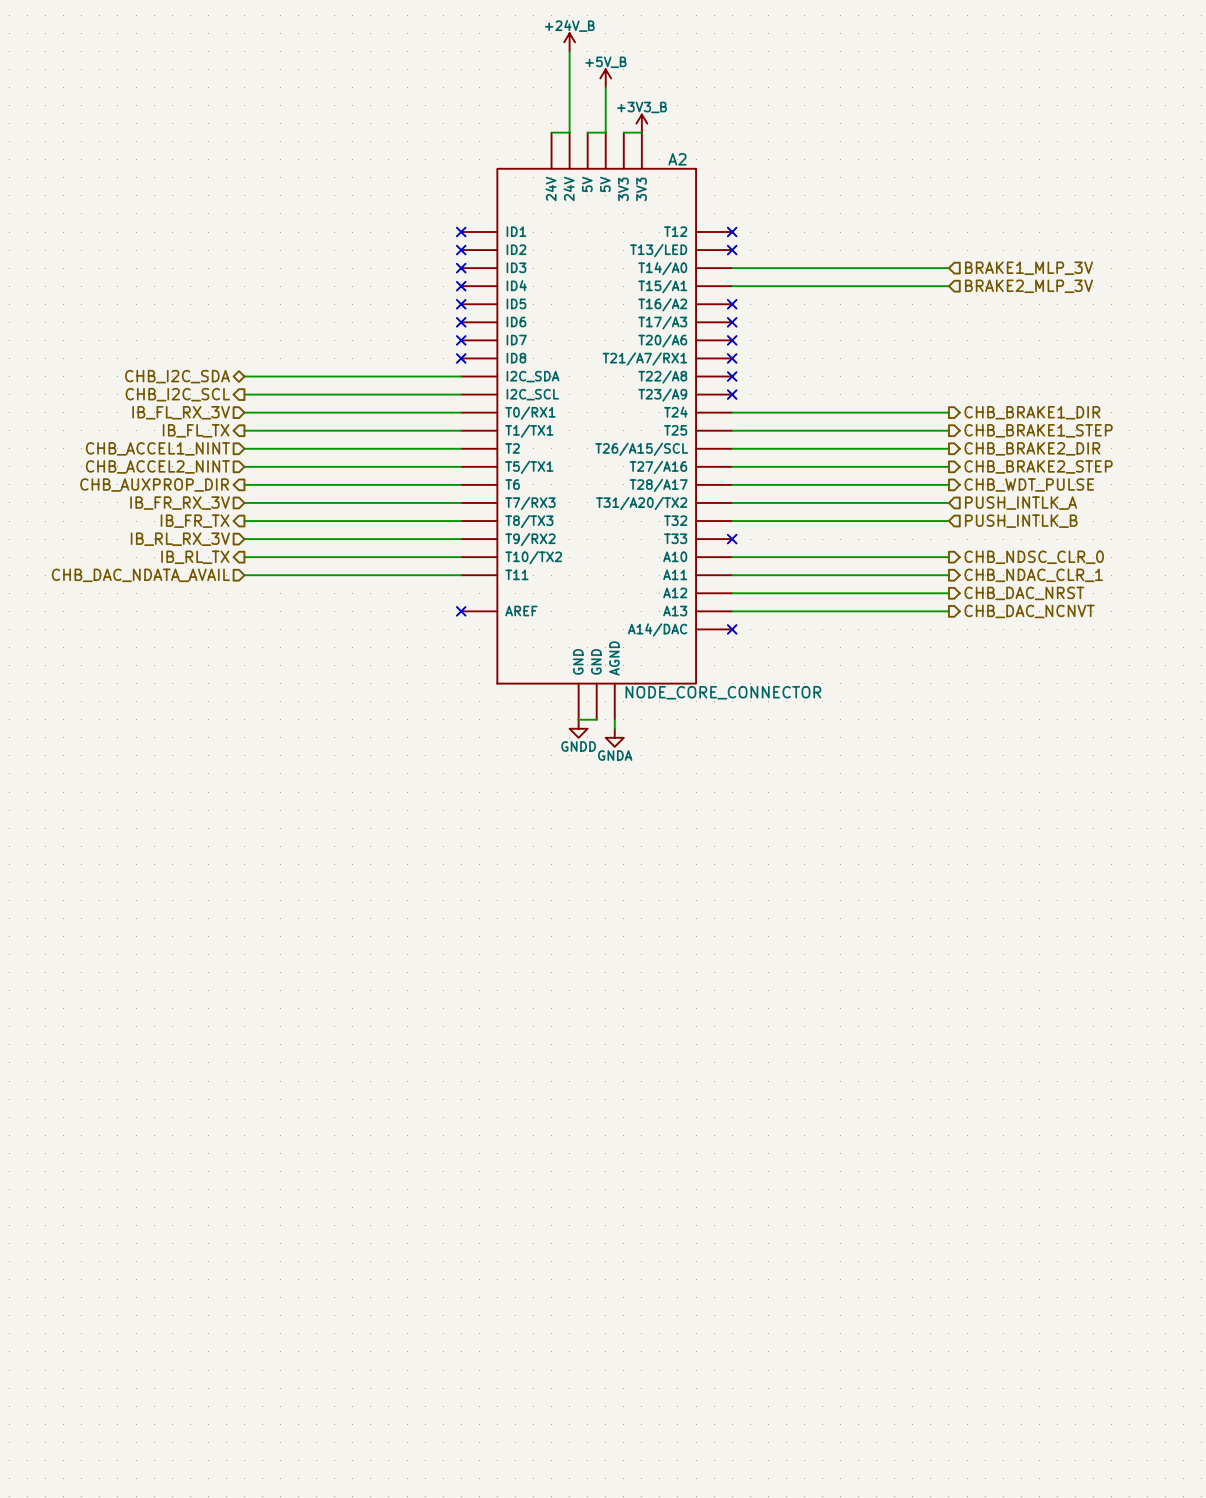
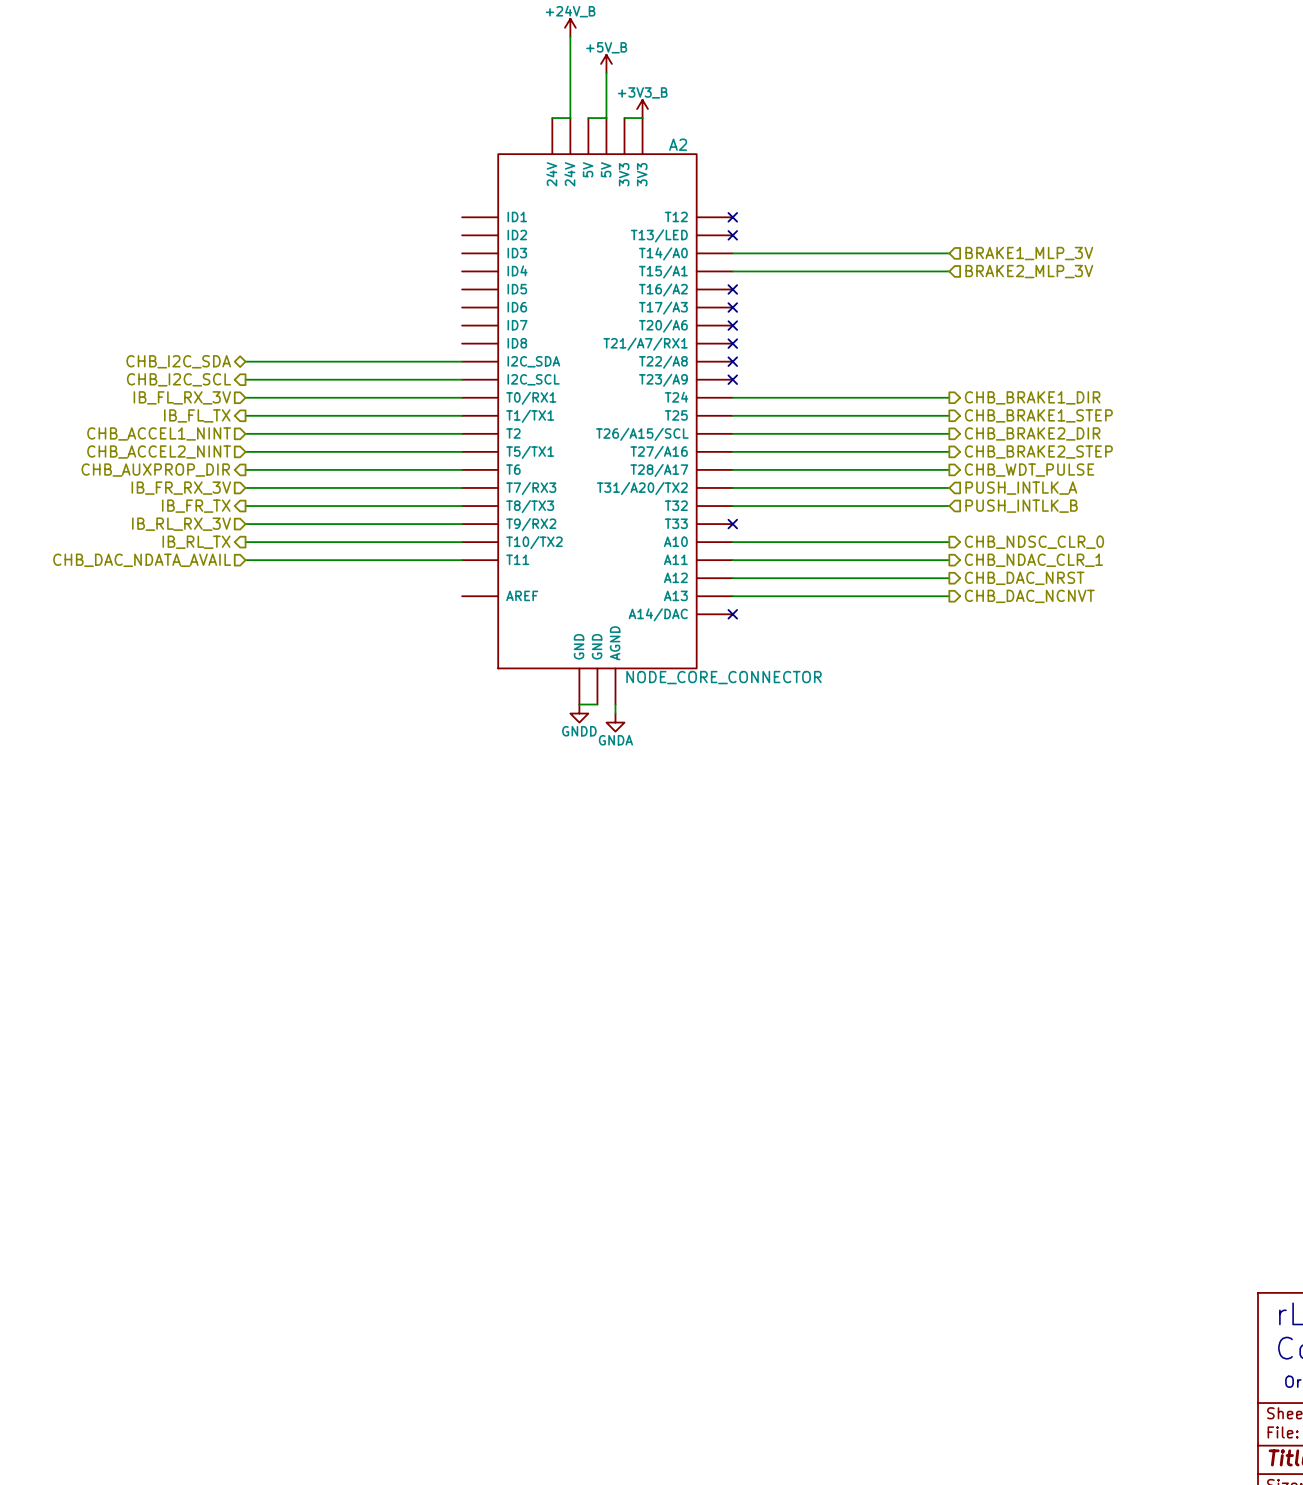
no-connect mark: (461, 232) -> none
no-connect mark: (461, 250) -> none
no-connect mark: (461, 268) -> none
no-connect mark: (461, 286) -> none
no-connect mark: (461, 304) -> none
no-connect mark: (461, 322) -> none
no-connect mark: (461, 340) -> none
no-connect mark: (461, 358) -> none
no-connect mark: (461, 611) -> none

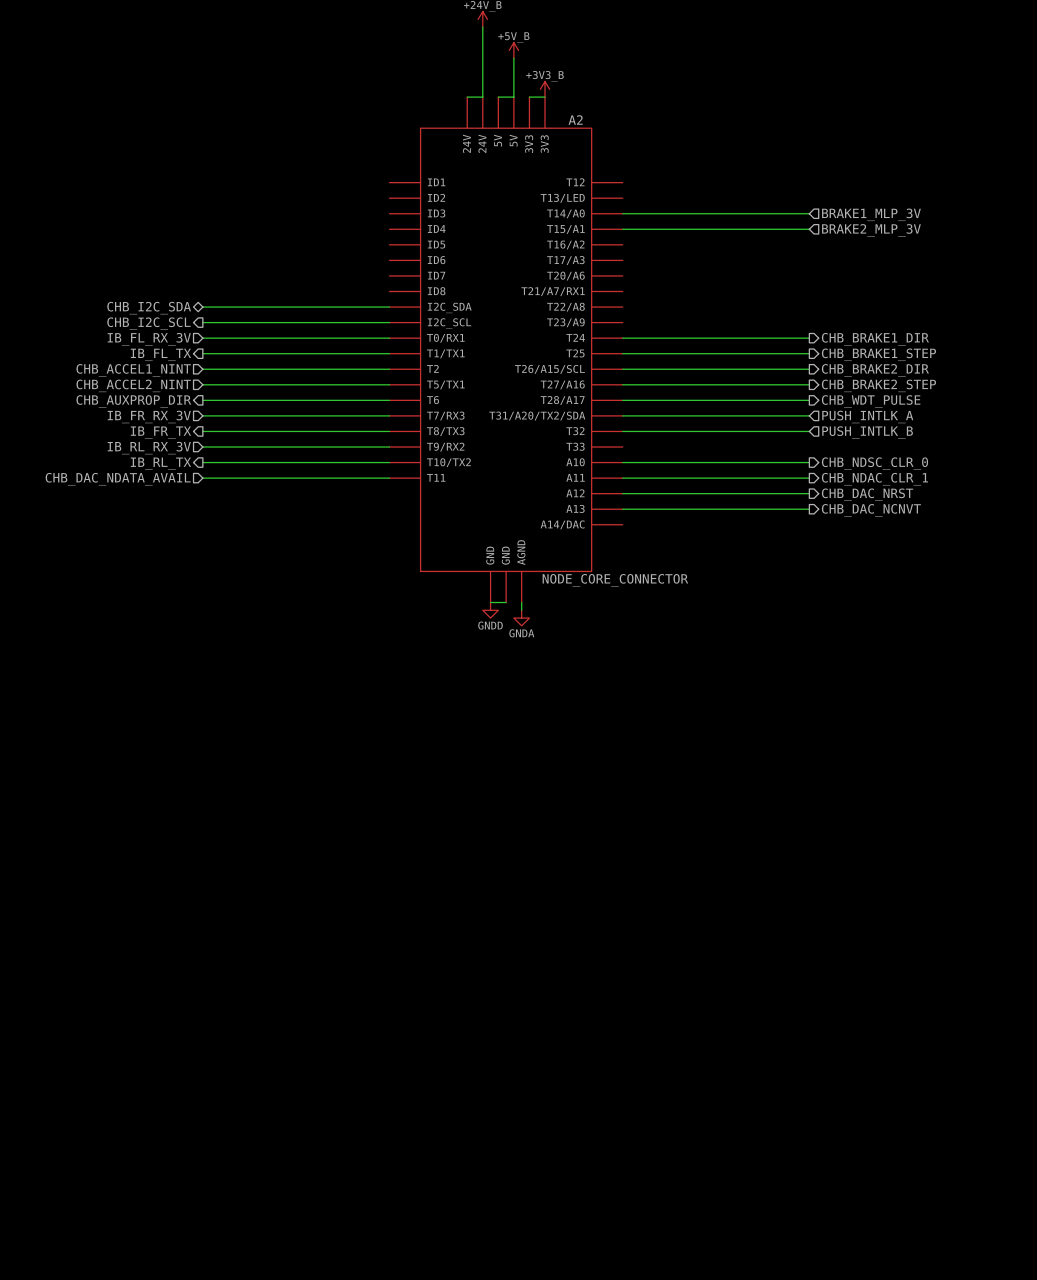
A2 symbol: [462, 118, 733, 705] -> [389, 97, 623, 603]
no-connect mark: (732, 217) -> none
no-connect mark: (732, 235) -> none
no-connect mark: (732, 289) -> none
no-connect mark: (732, 307) -> none
no-connect mark: (732, 325) -> none
no-connect mark: (732, 343) -> none
no-connect mark: (732, 361) -> none
no-connect mark: (732, 379) -> none
no-connect mark: (732, 524) -> none
no-connect mark: (732, 614) -> none

